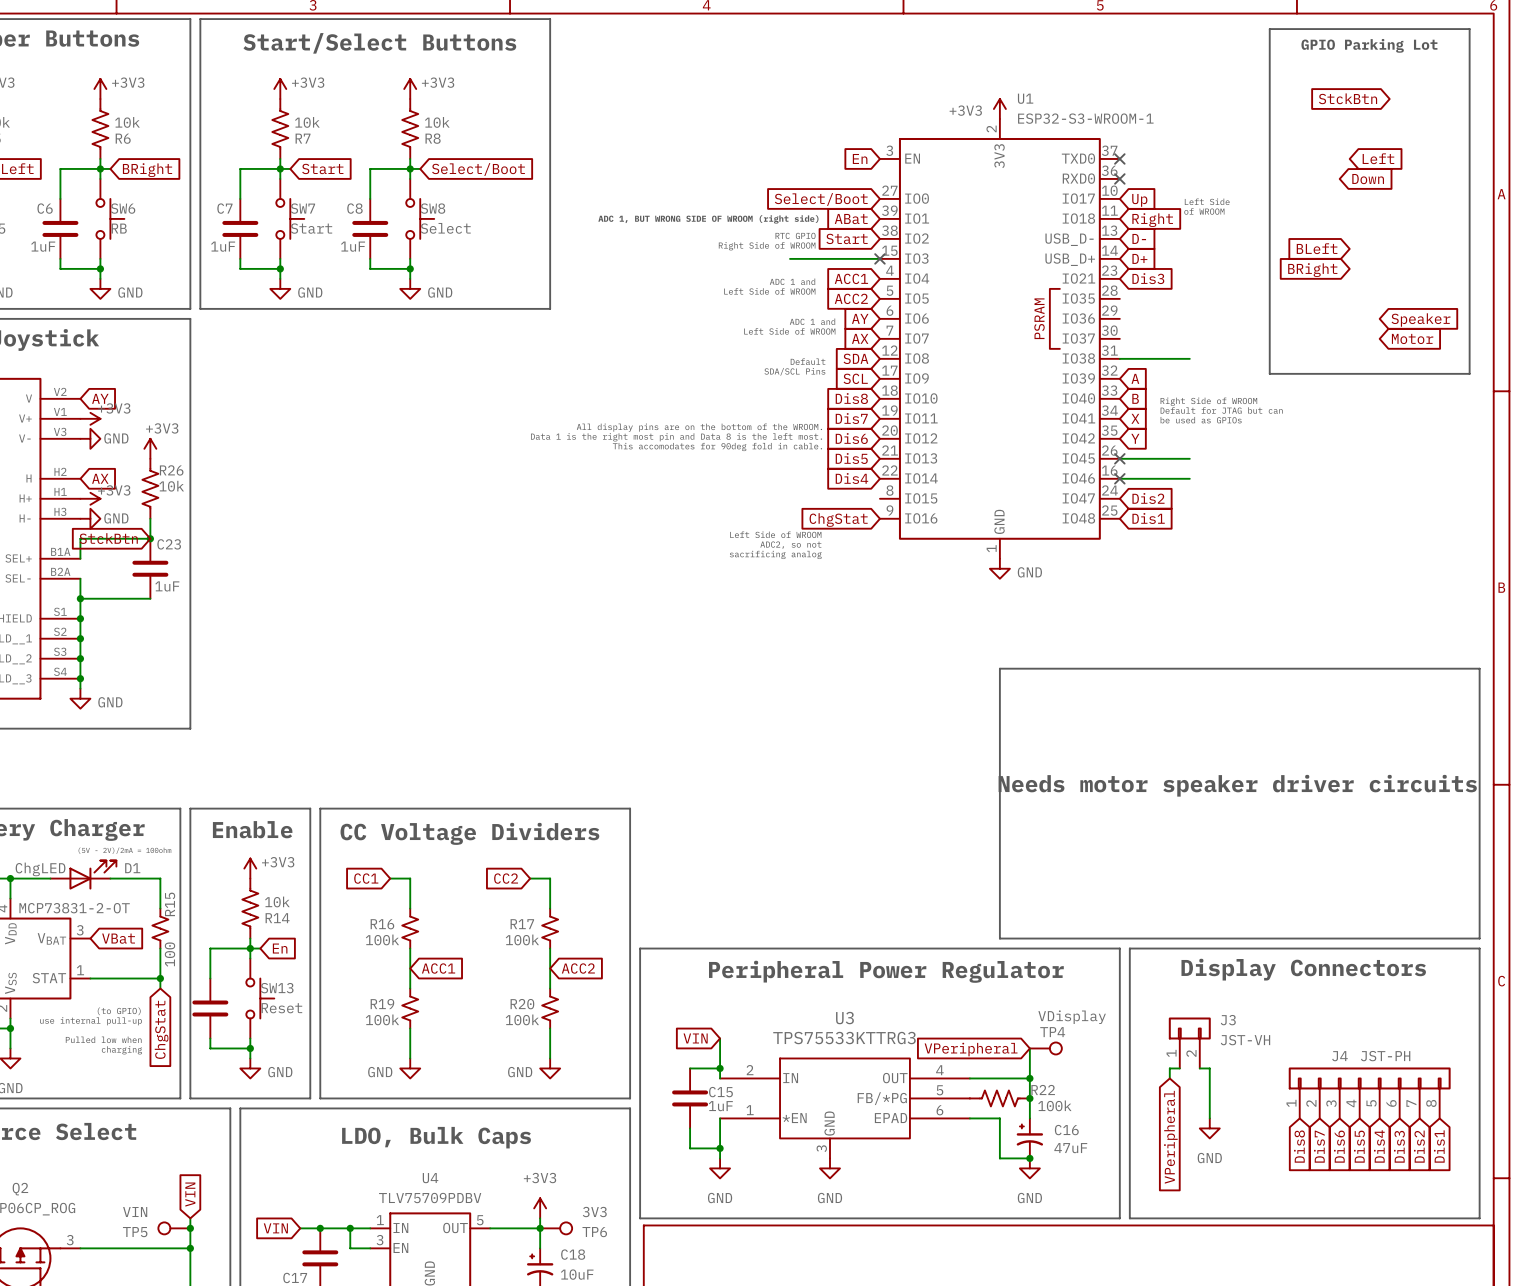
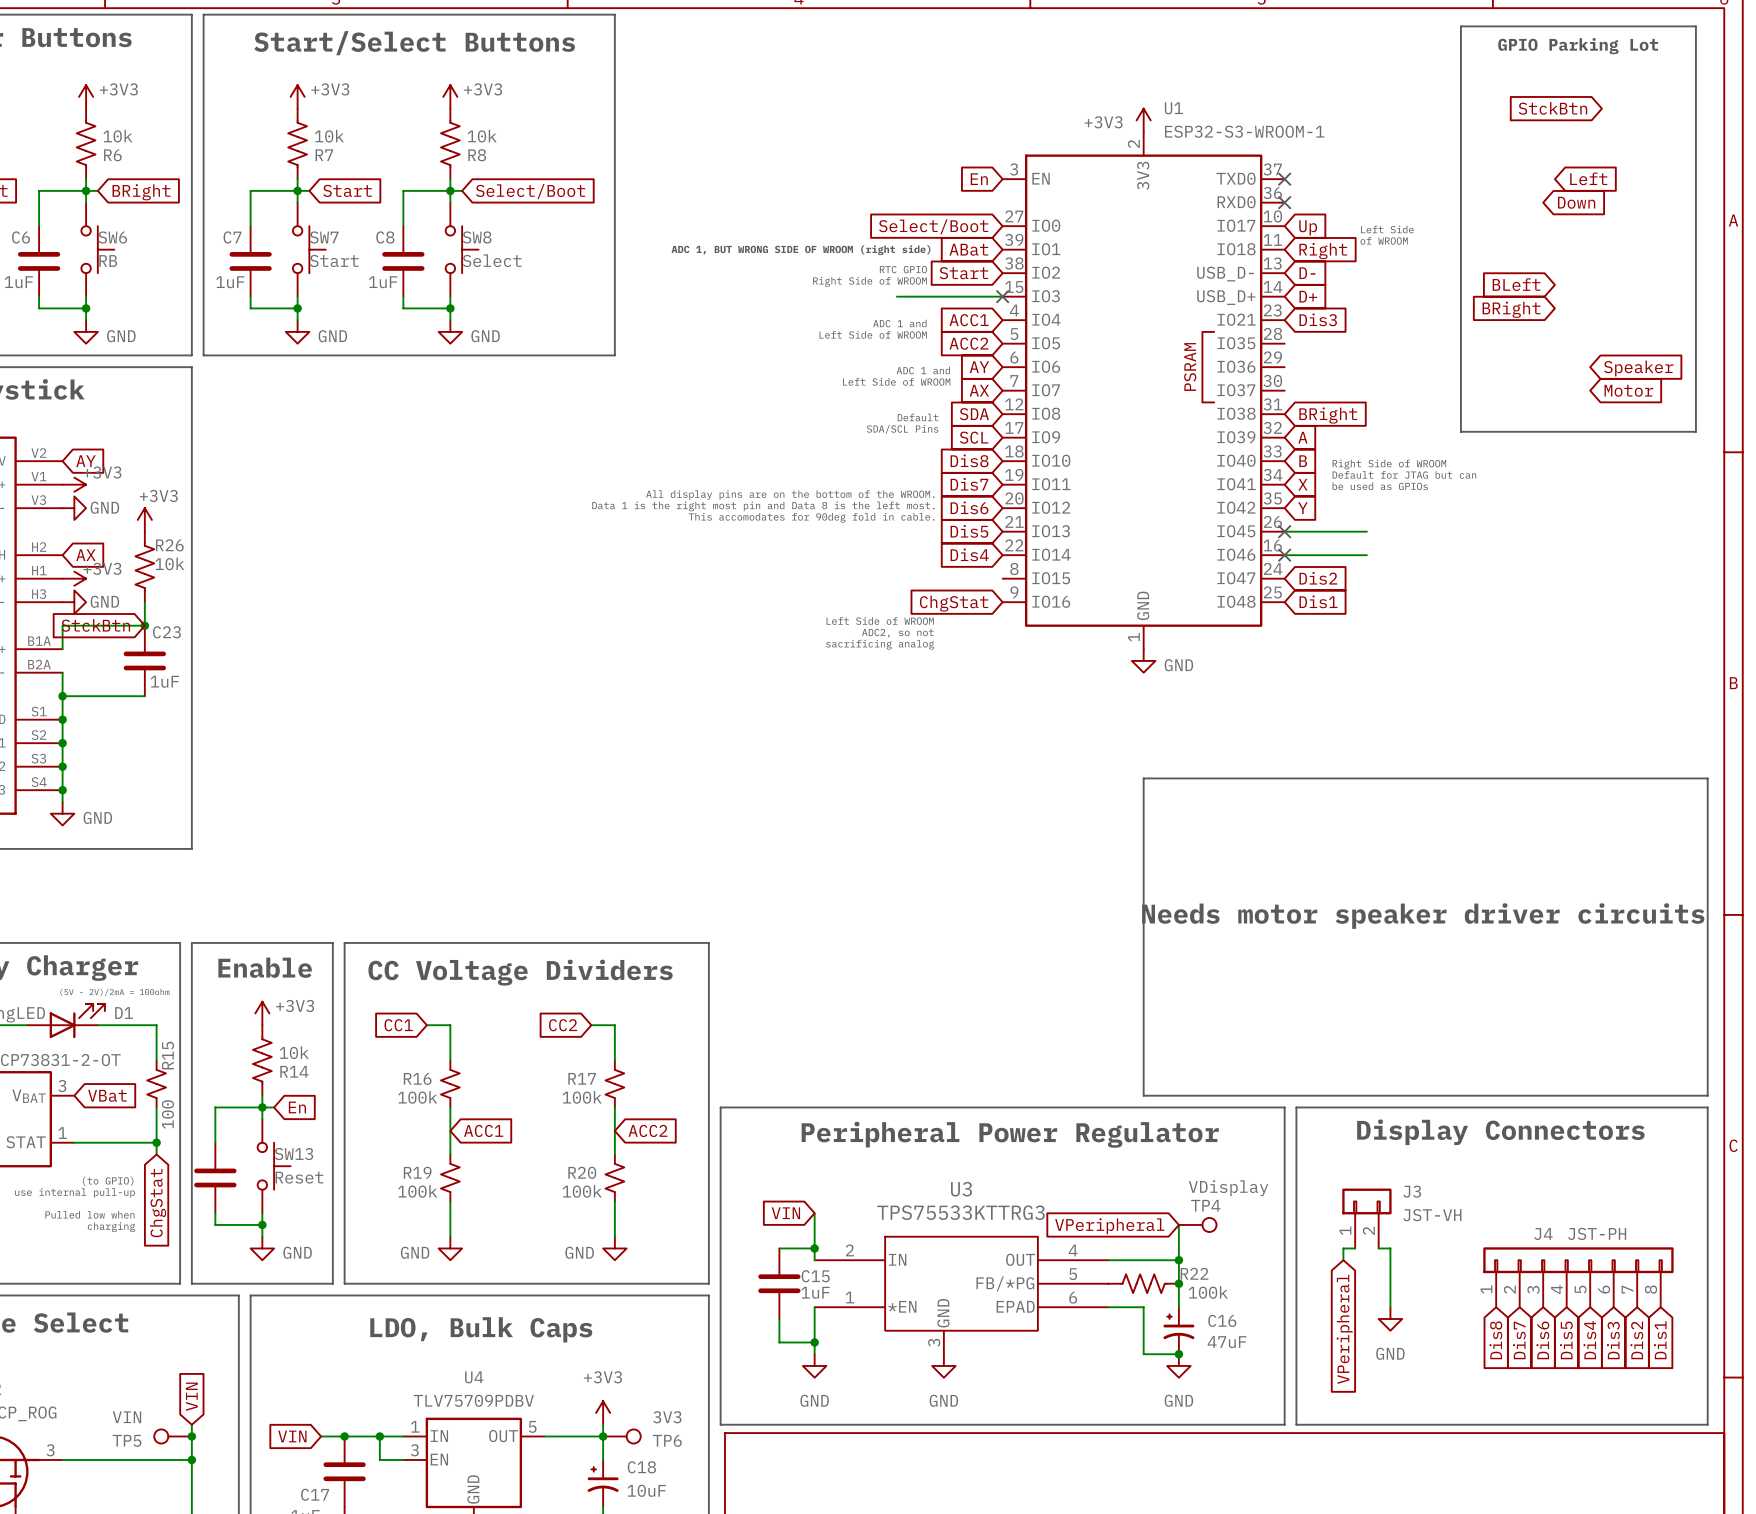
wire: (1119, 358) (1189, 358) -> none
global label: none -> BRight (1328, 415)

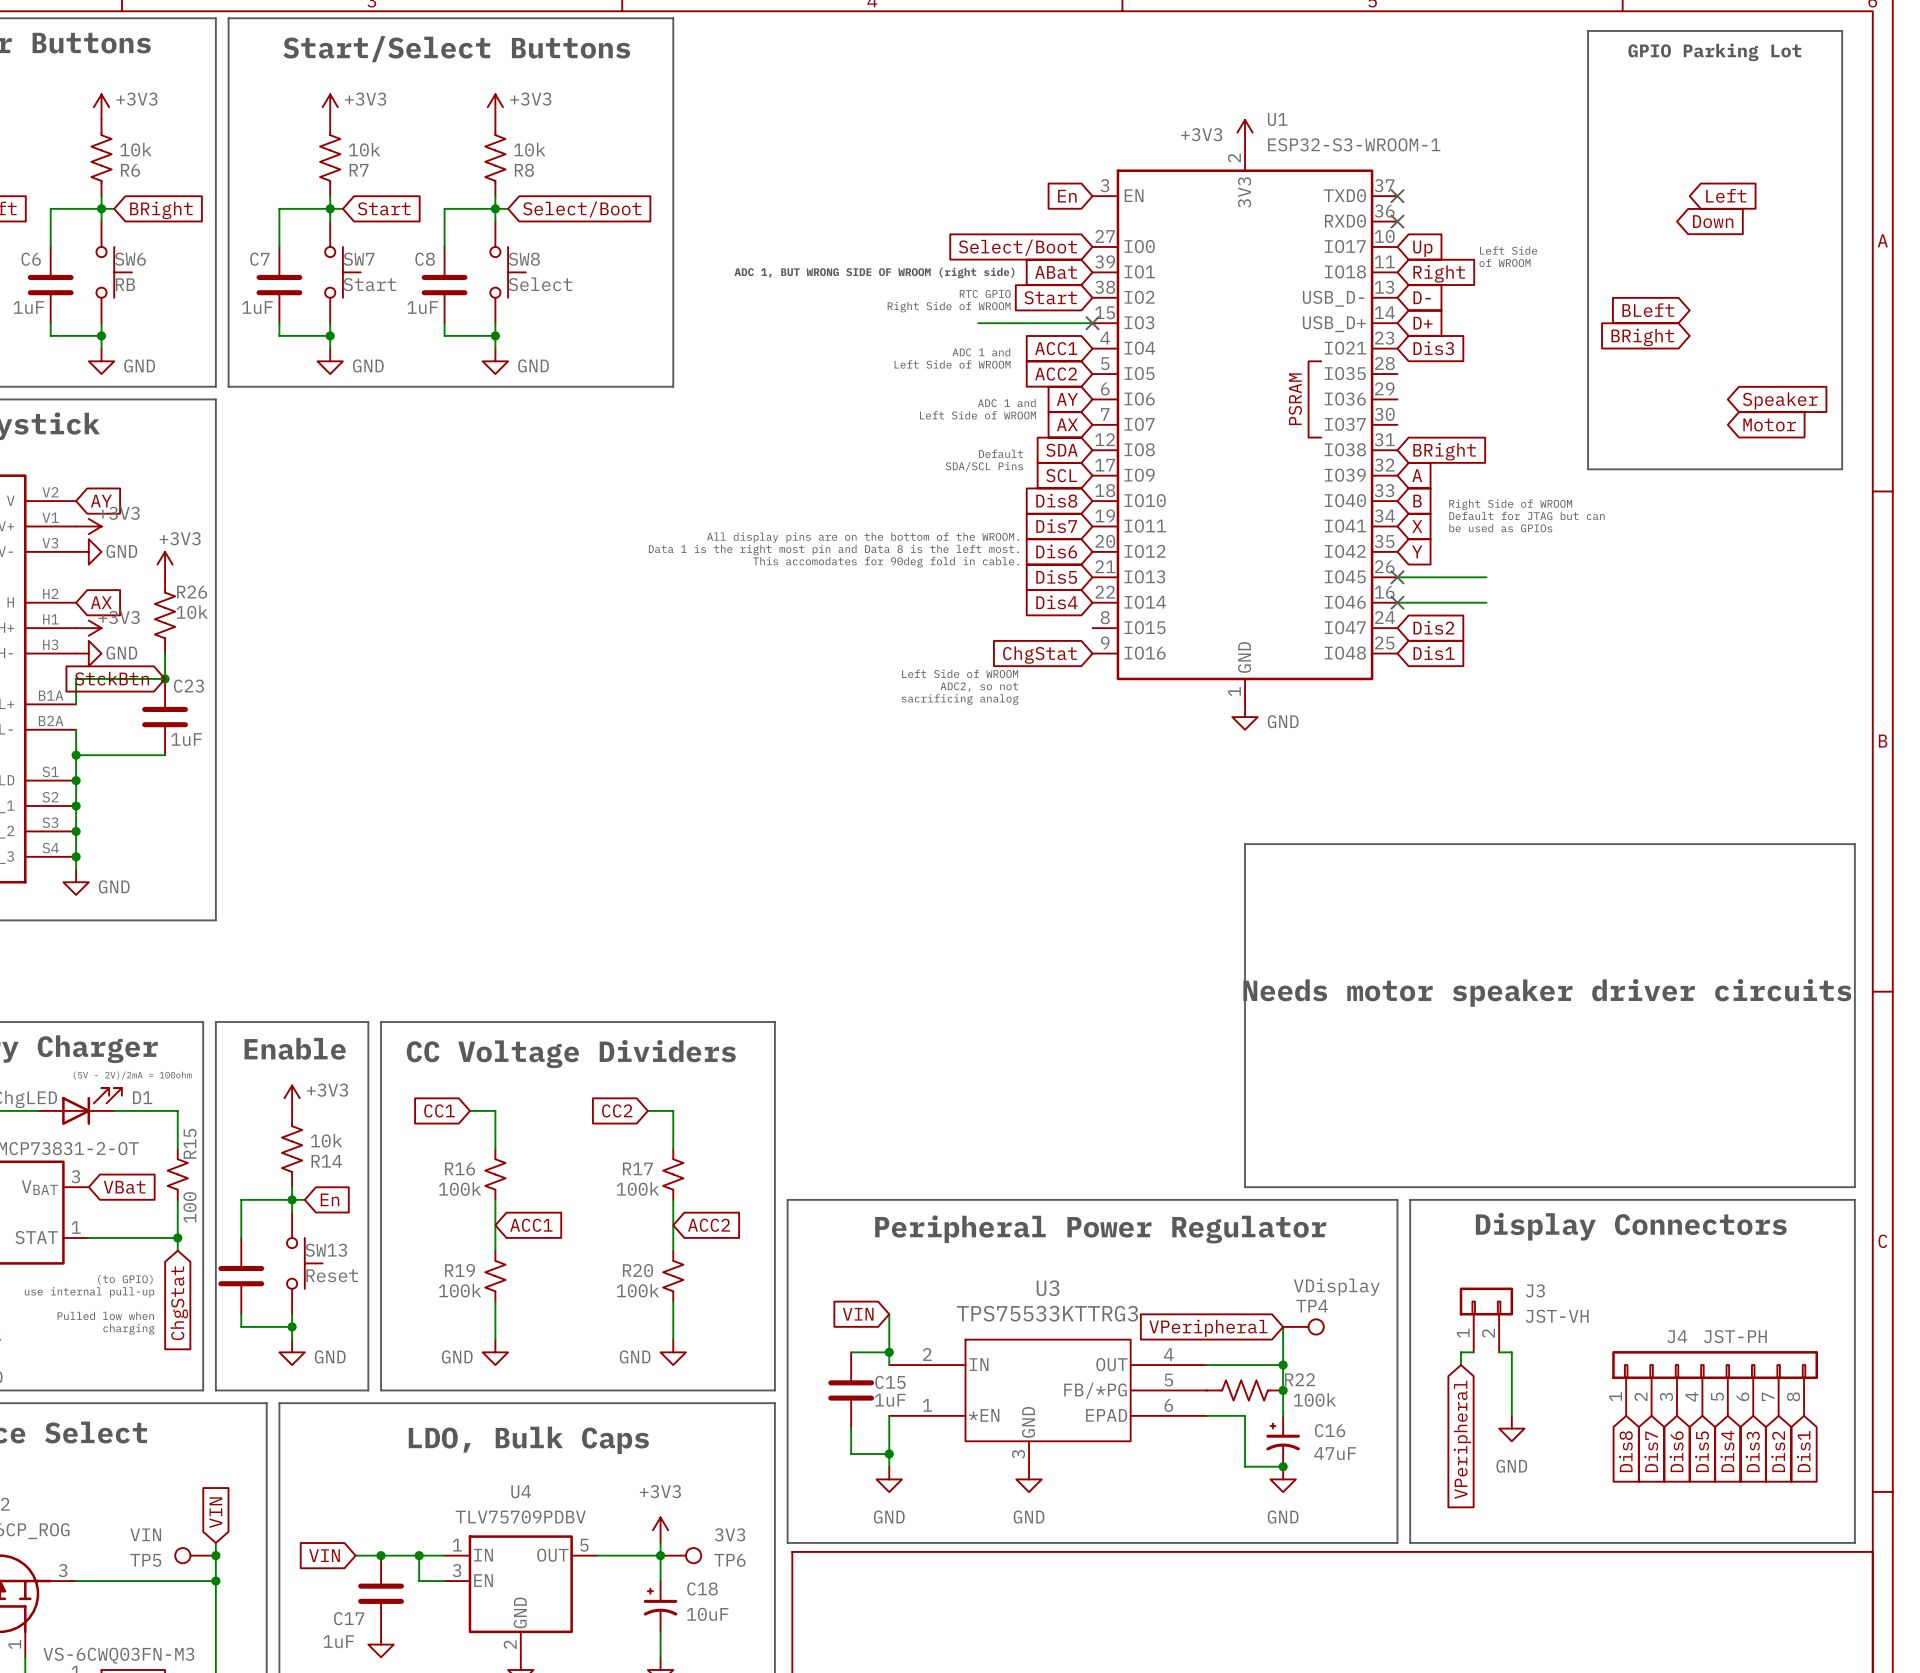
global label: StckBtn (1552, 108) -> none

